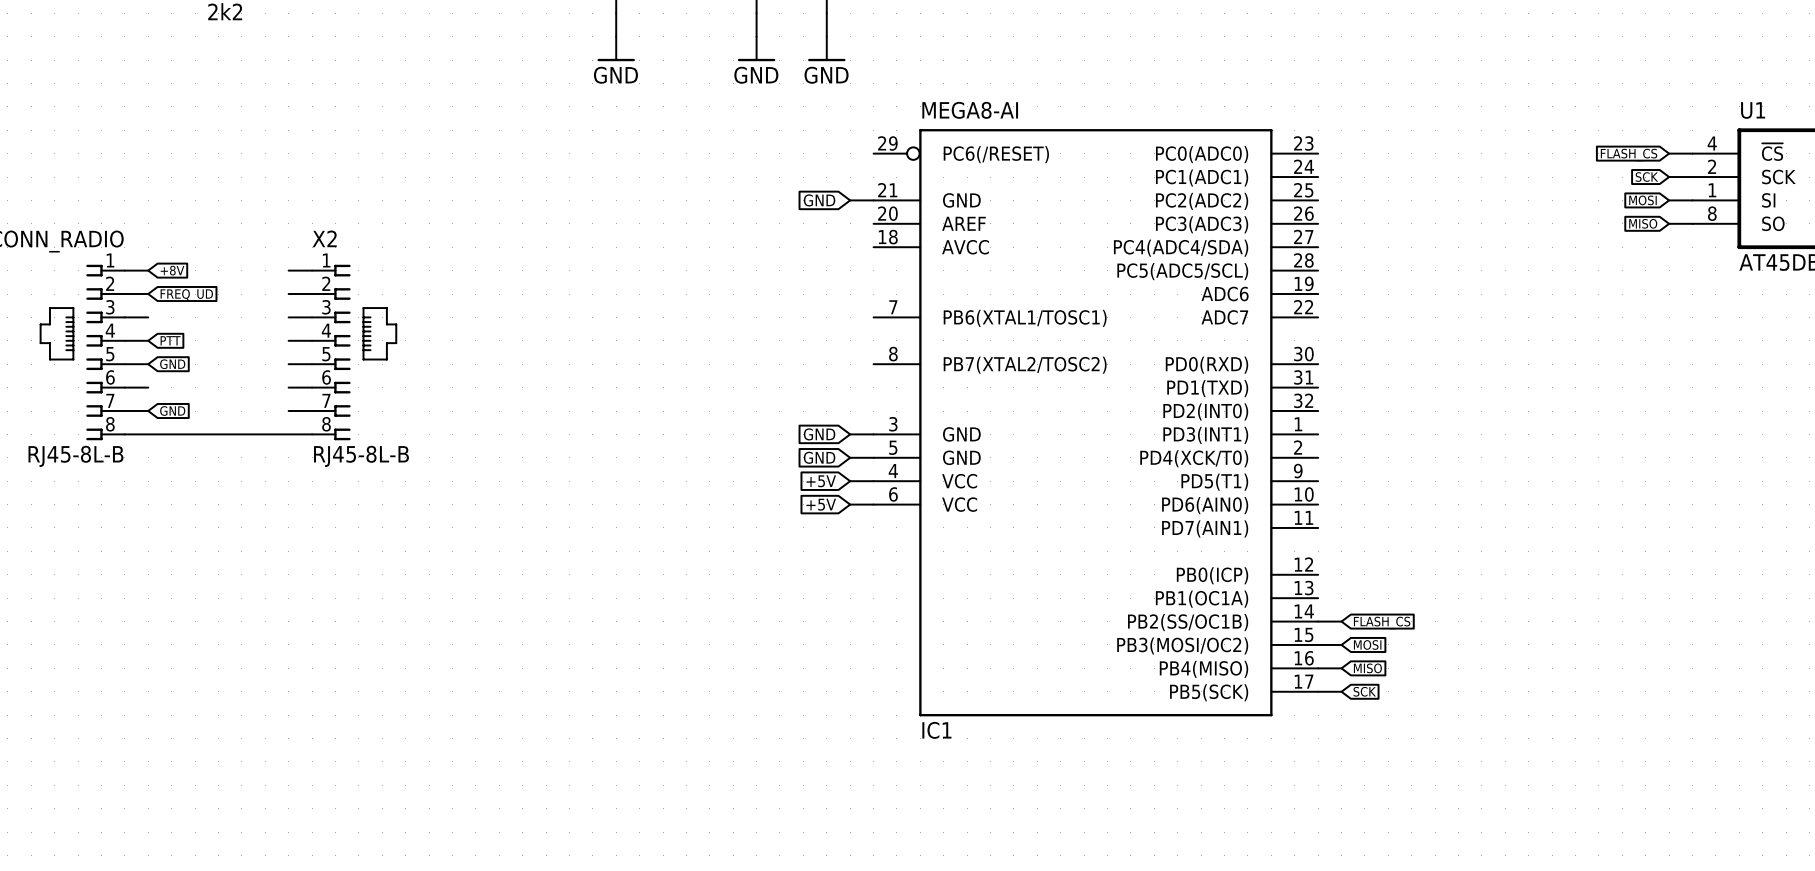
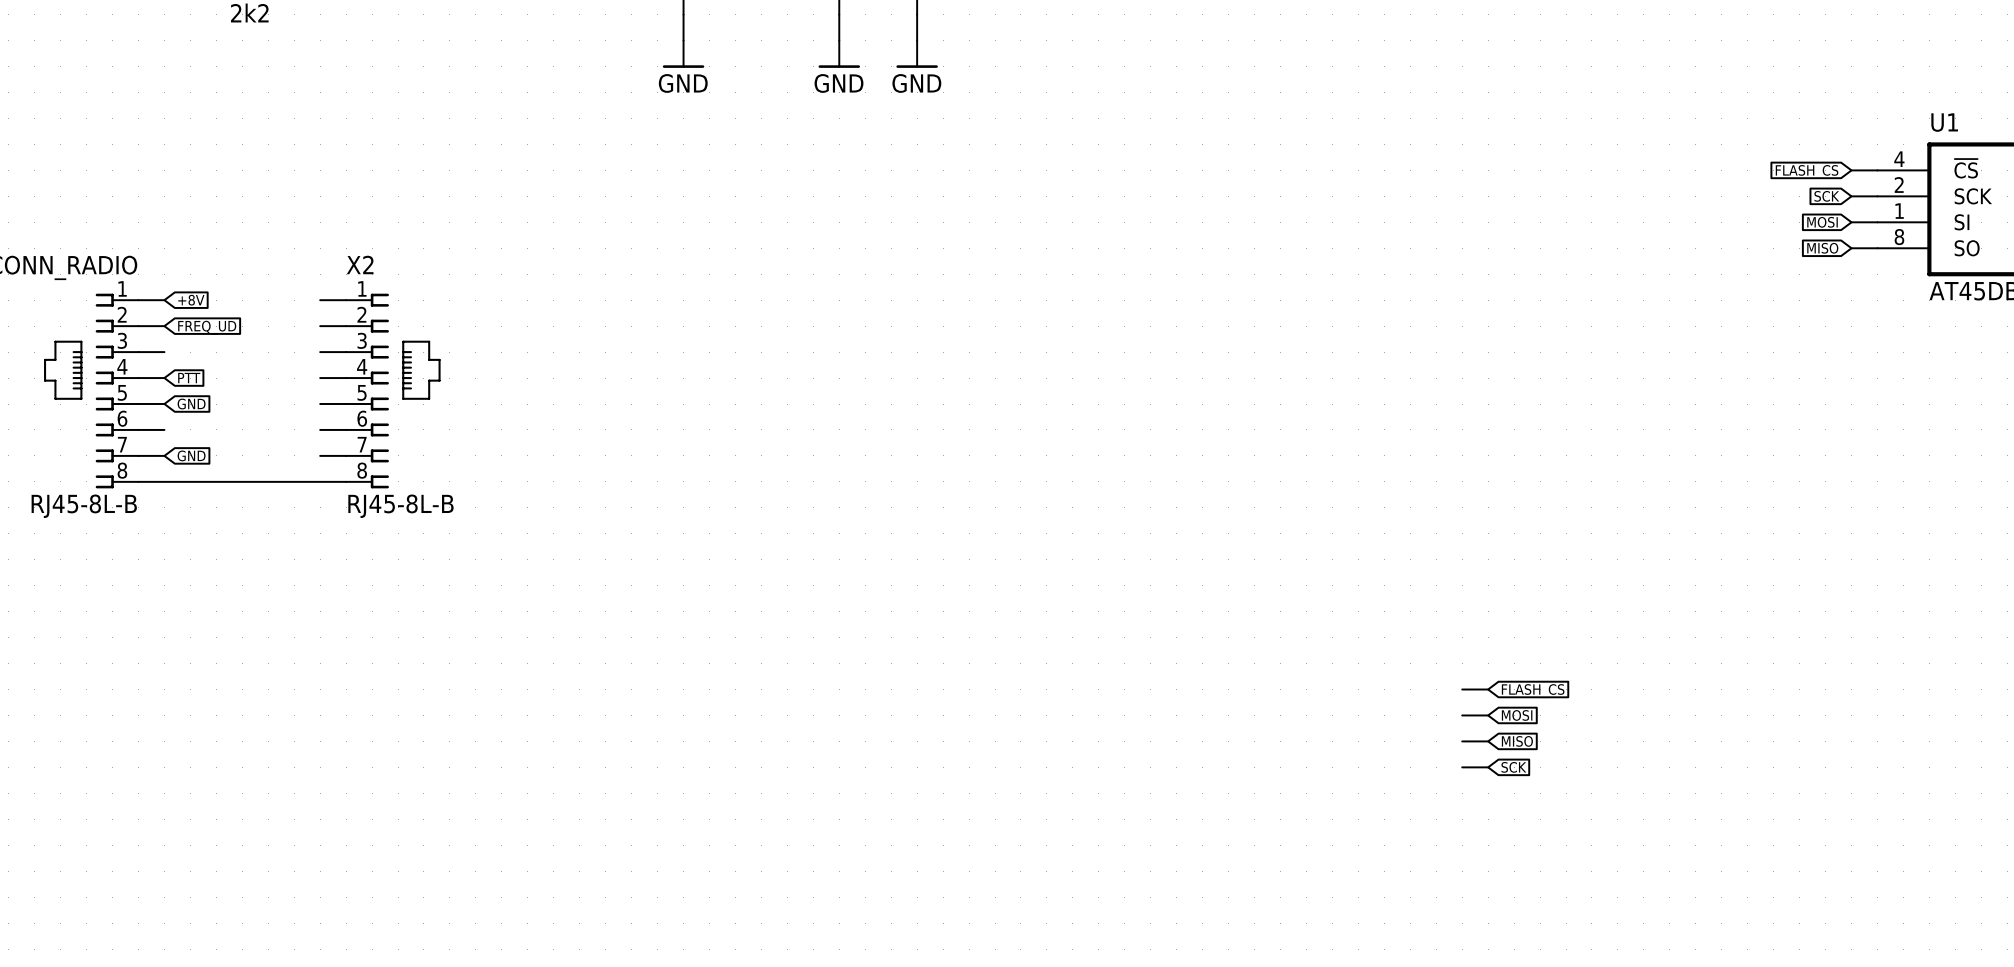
global label: GND (819, 200) -> none
wire: (850, 200) (873, 200) -> none
IC1: MEGA8-AI (1095, 422) -> none
global label: GND (819, 434) -> none
wire: (850, 434) (873, 434) -> none
global label: GND (819, 457) -> none
wire: (850, 457) (873, 457) -> none
global label: +5V (821, 481) -> none
wire: (850, 481) (873, 481) -> none
global label: +5V (821, 504) -> none
wire: (850, 504) (873, 504) -> none

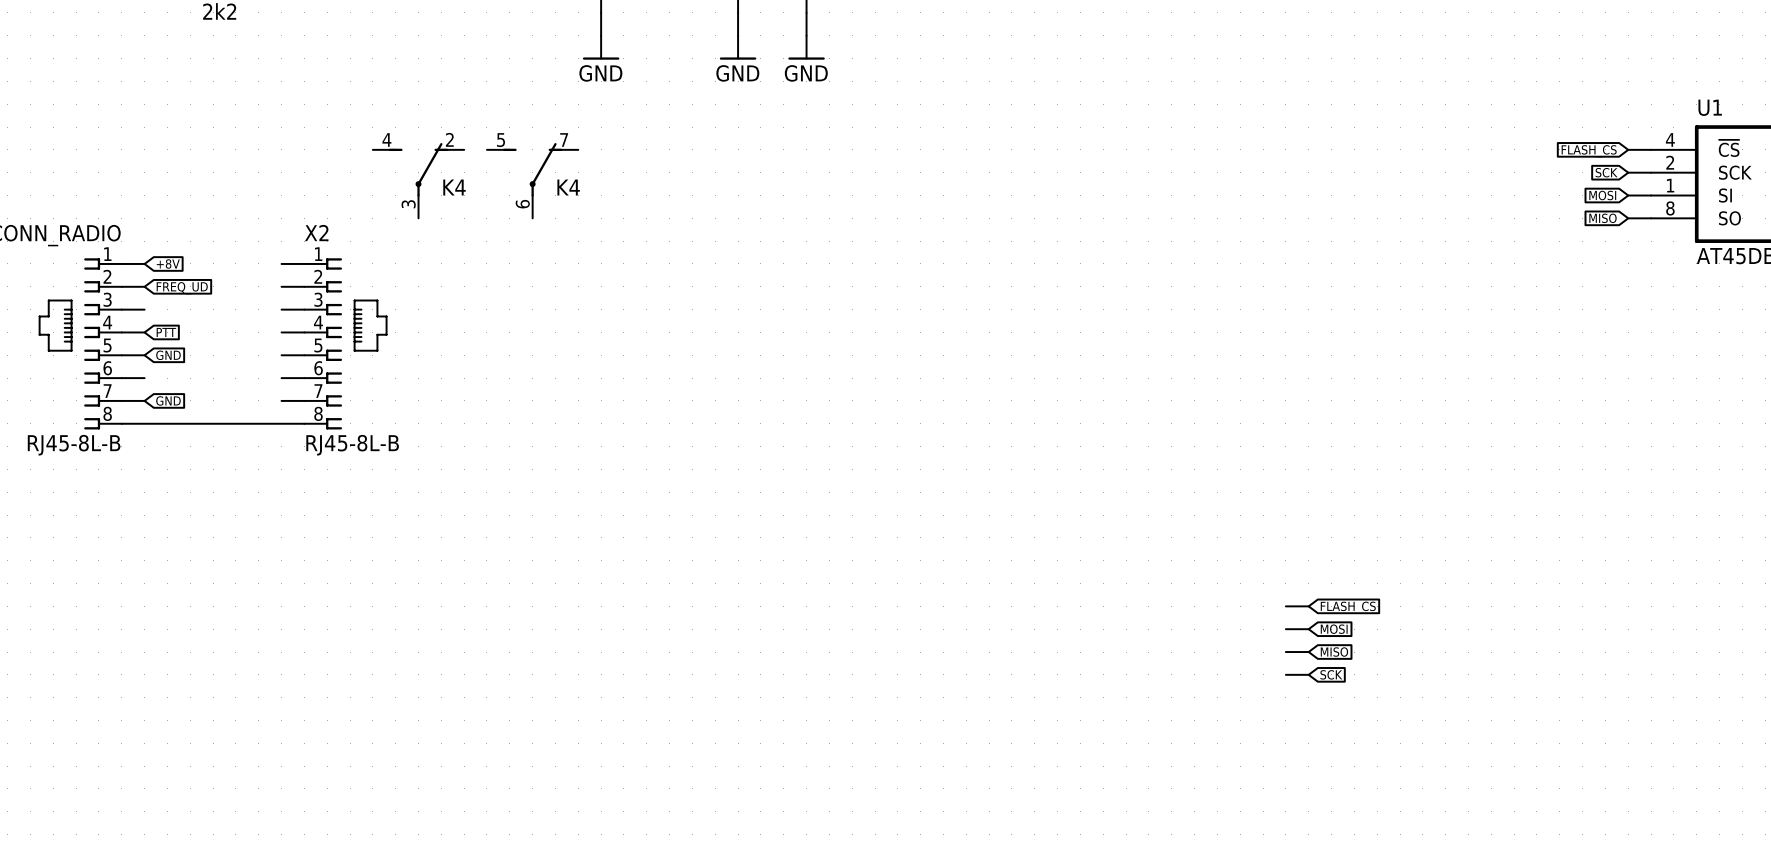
K4: none -> (418, 180)
K4: none -> (532, 180)

